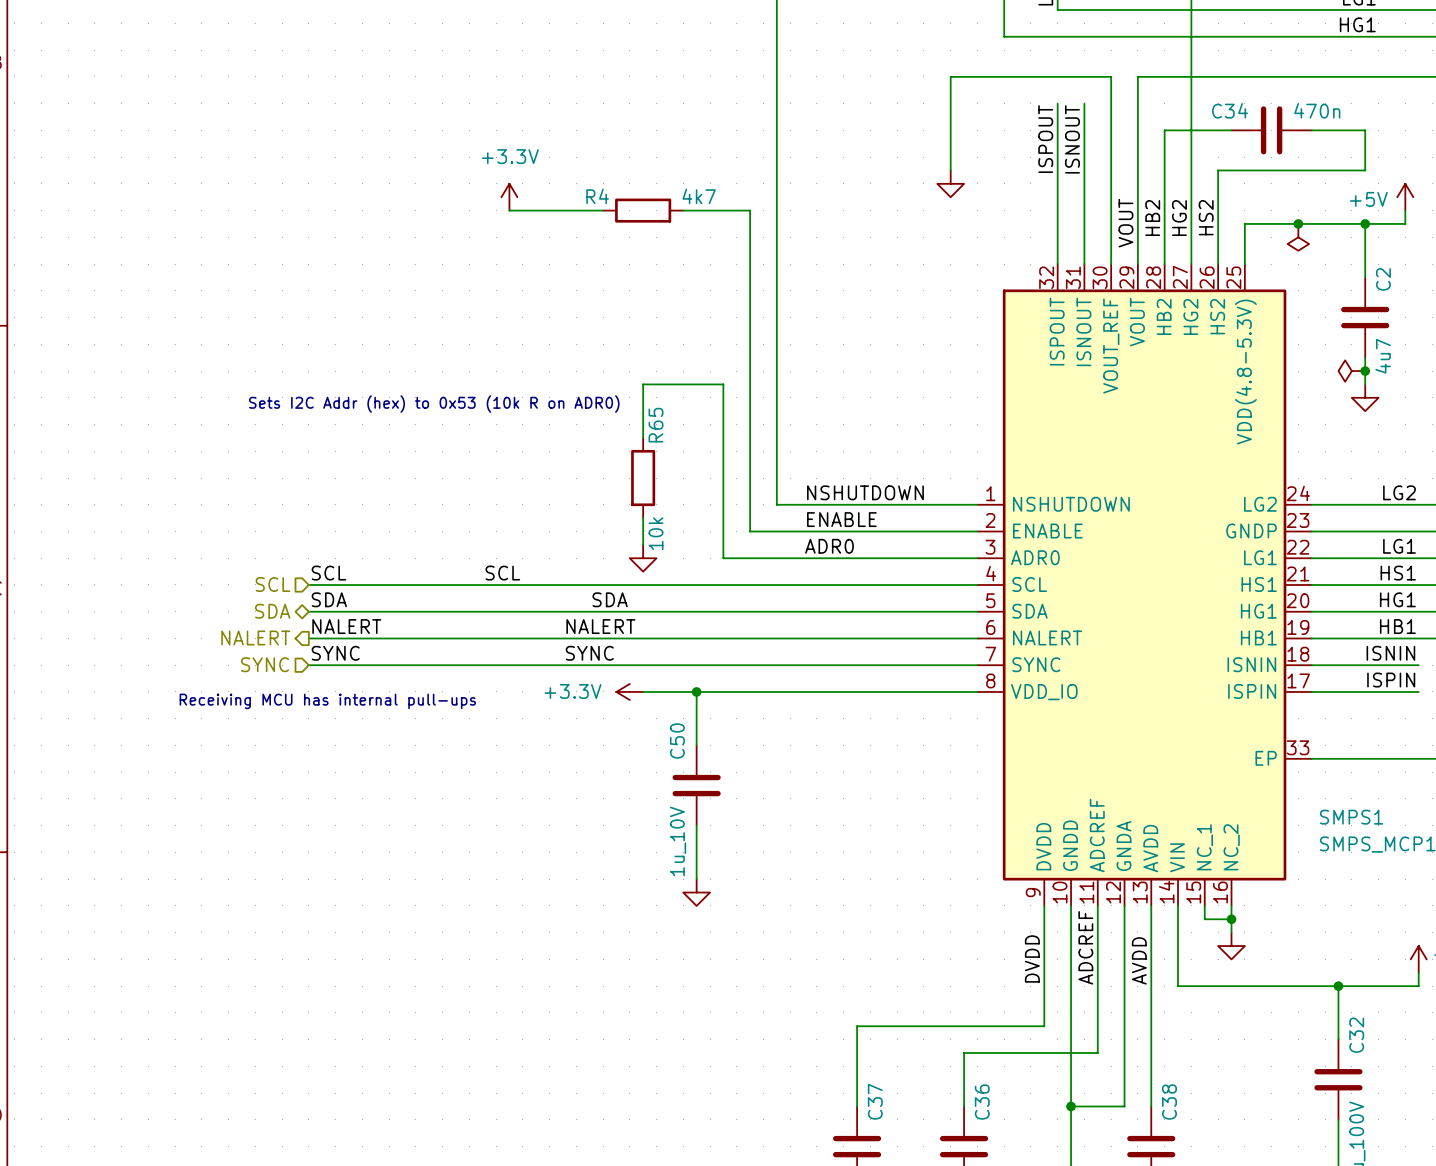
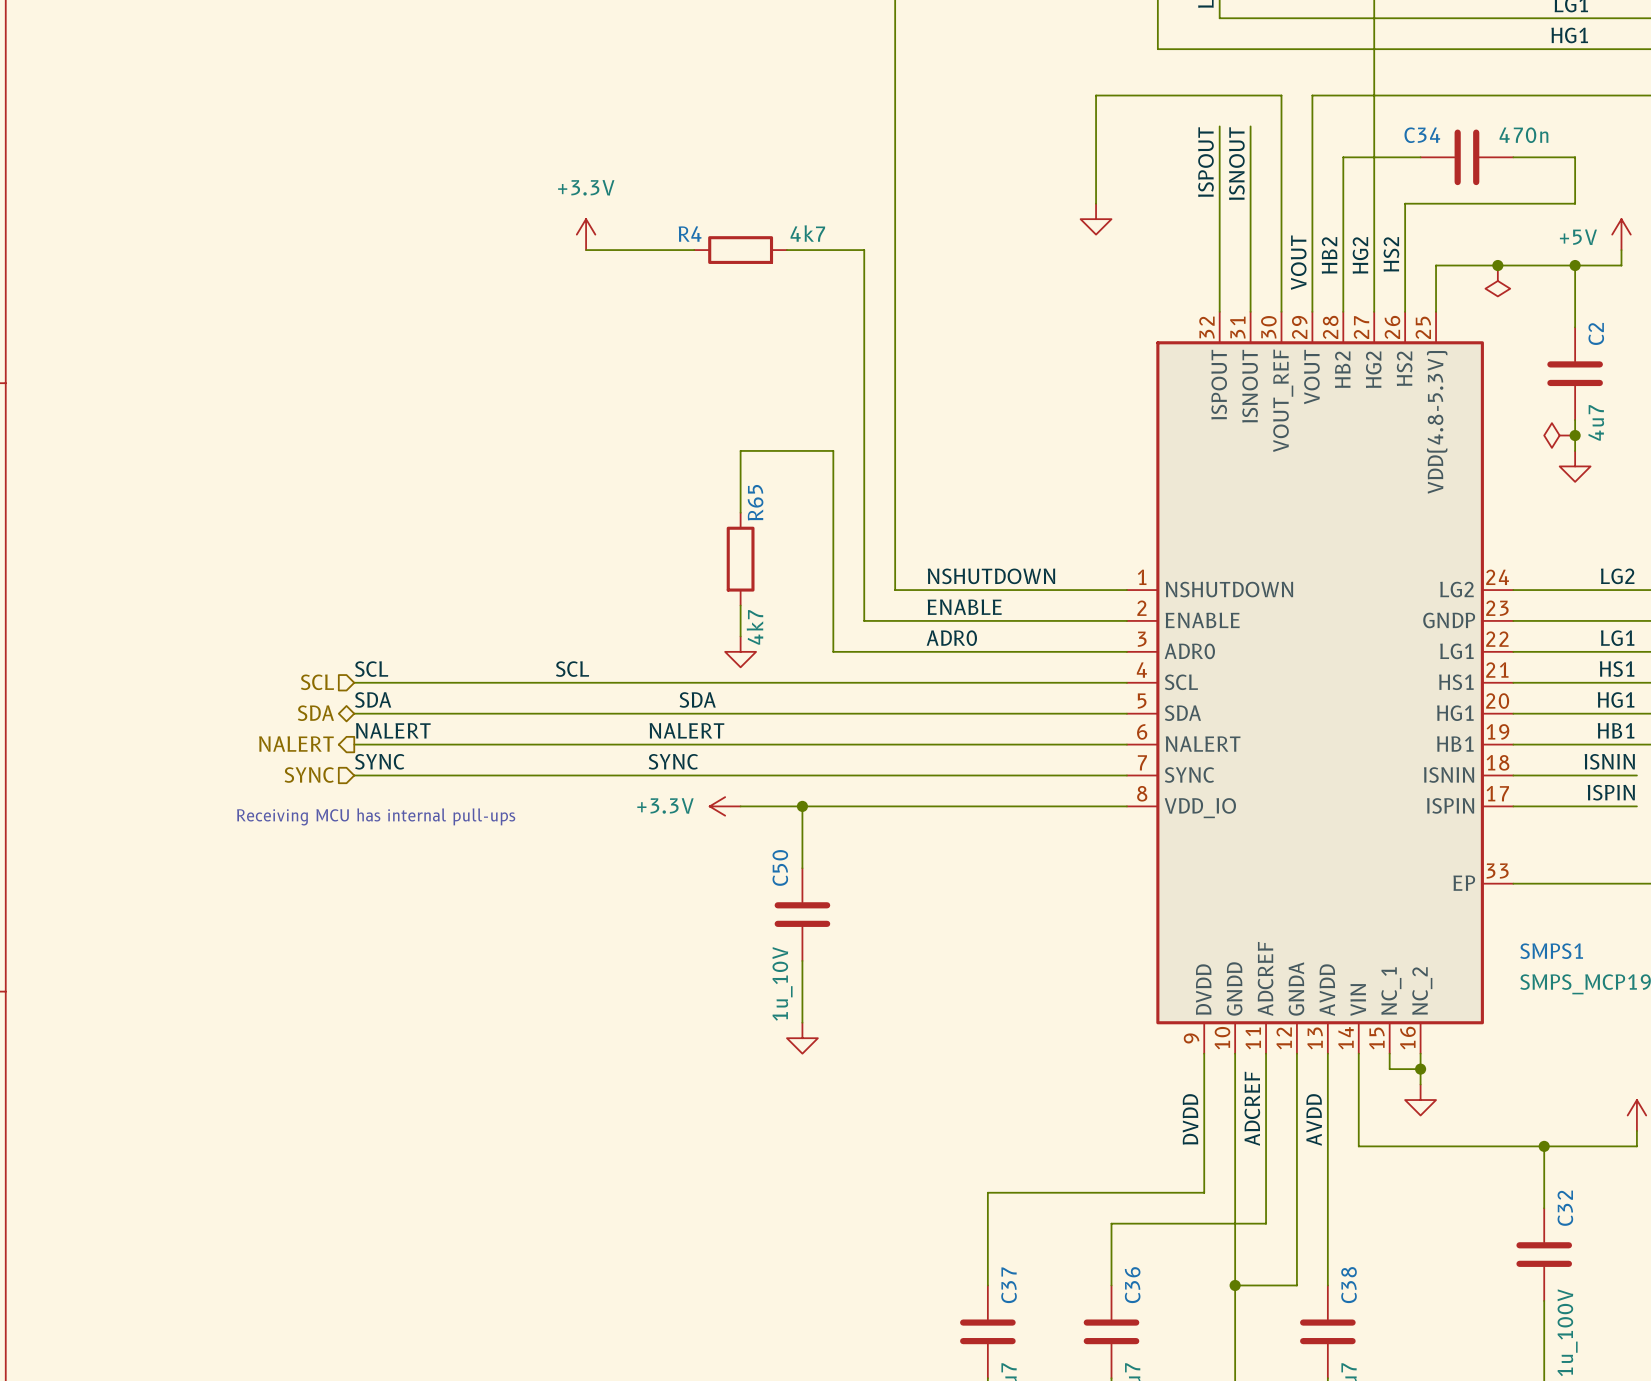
text: Sets I2C Addr (hex) to 0x53 (10k R on ADR0) (434, 404) -> none
R65 value: 10k (656, 533) -> 4k7 (754, 627)

